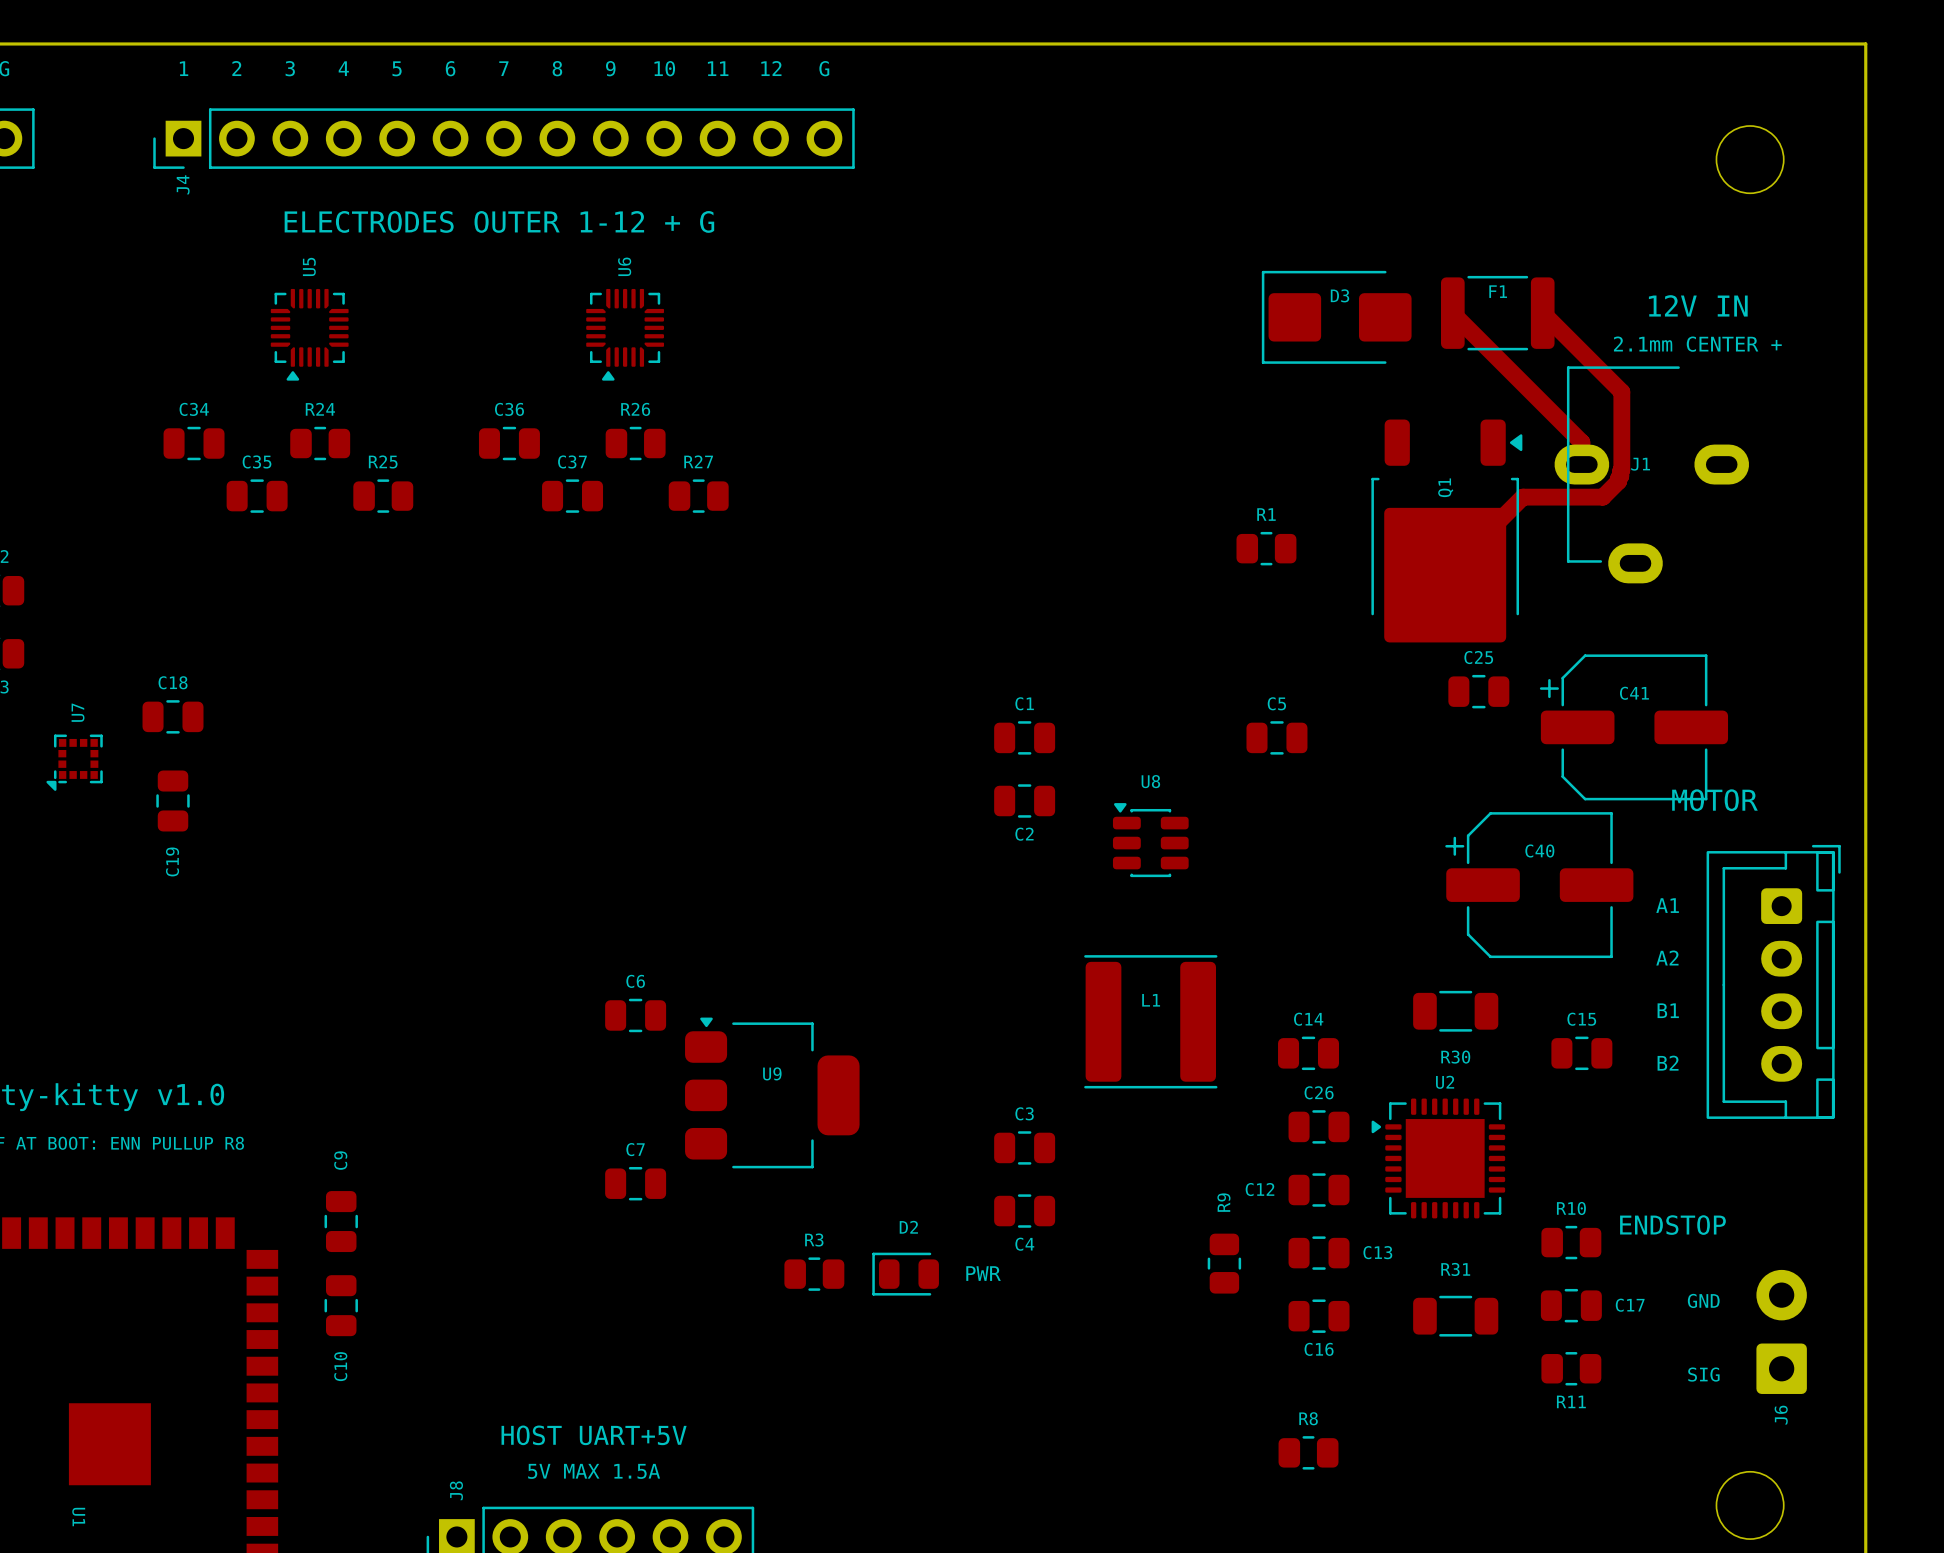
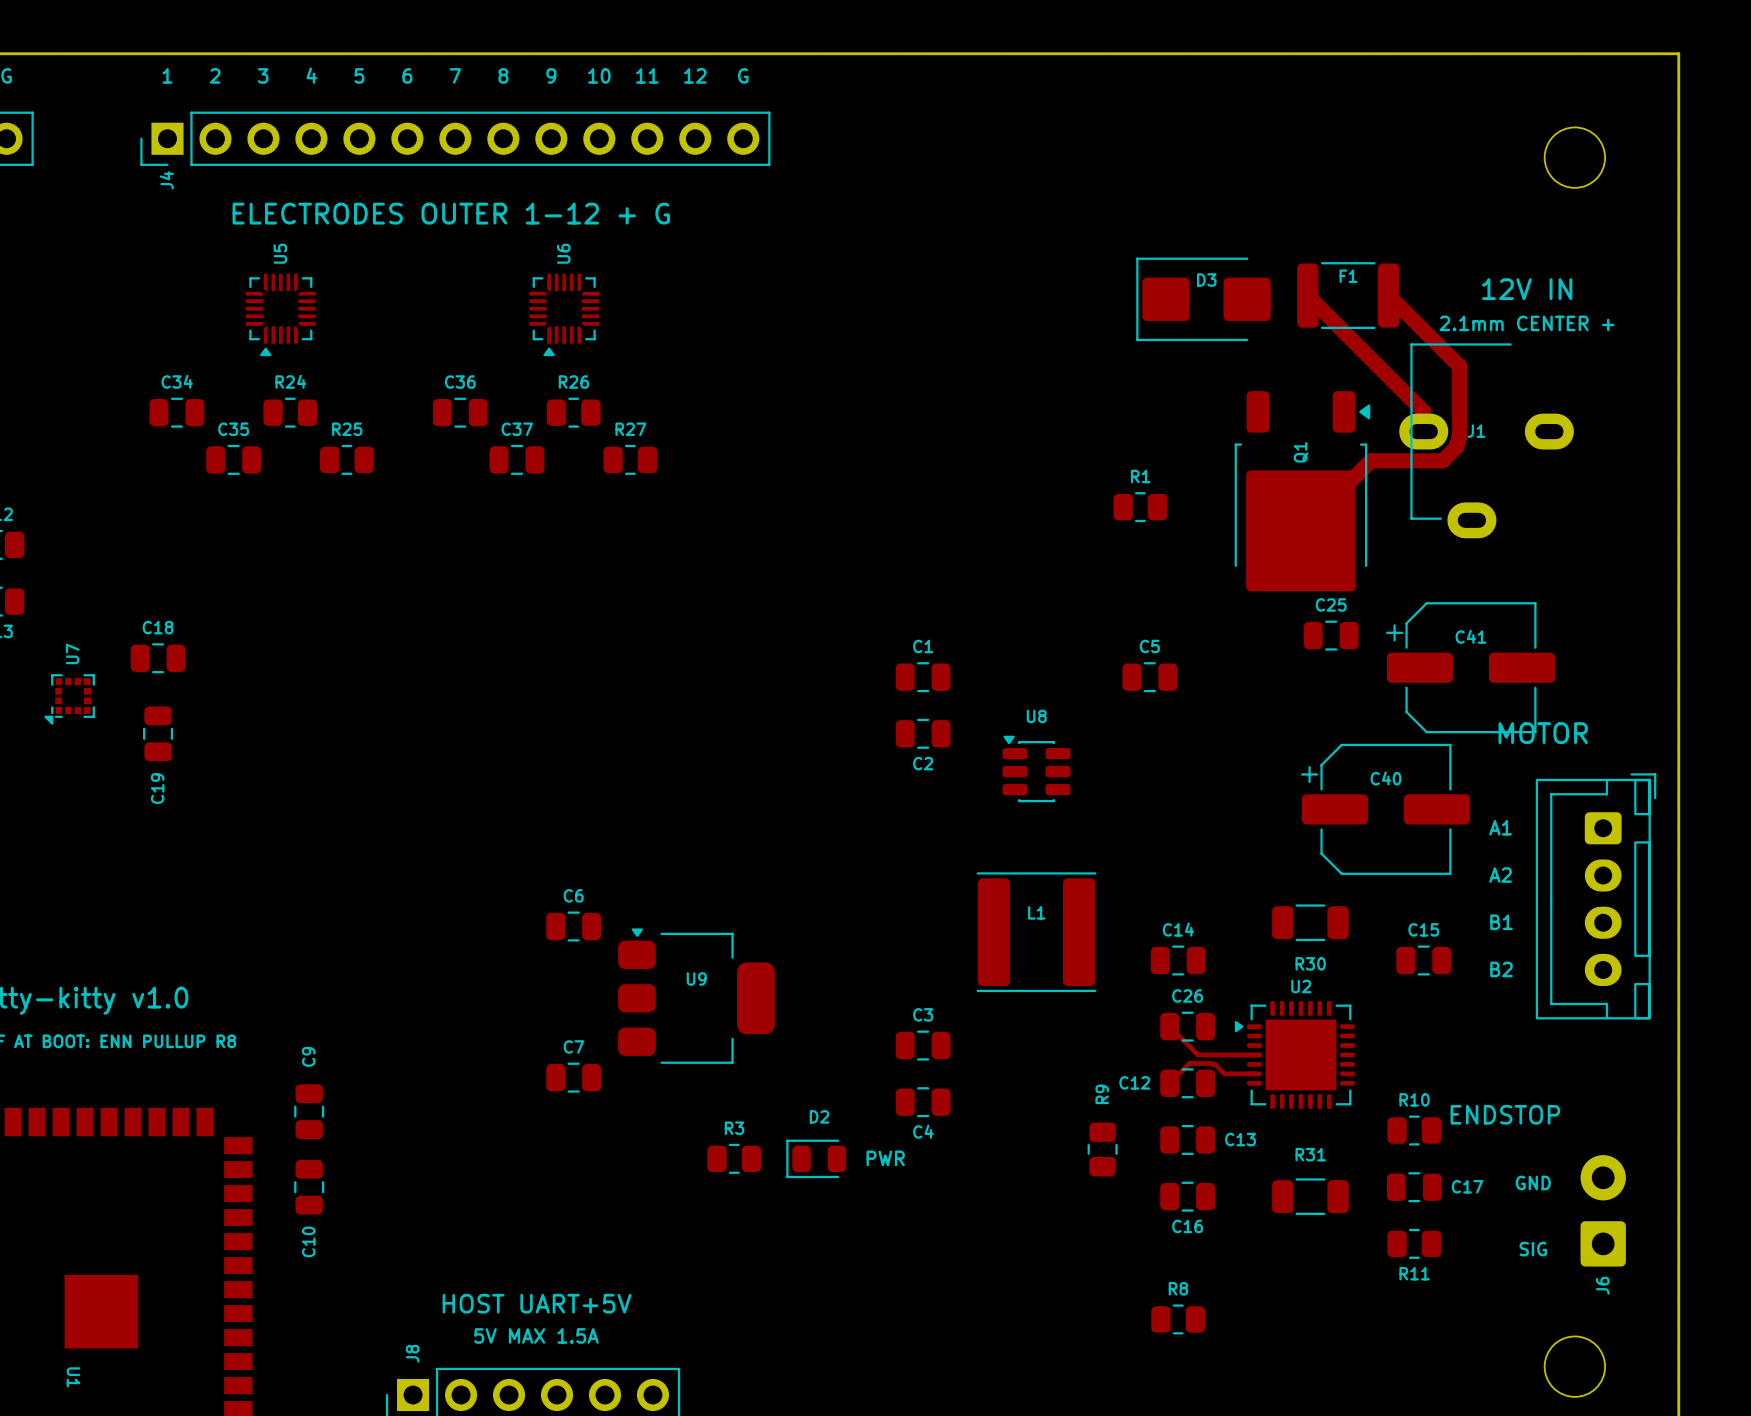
top track: none -> (1169, 1026) (1197, 1054) (1254, 1054)
top track: none -> (1254, 1073) (1224, 1073) (1214, 1064) (1189, 1063) (1169, 1083)

